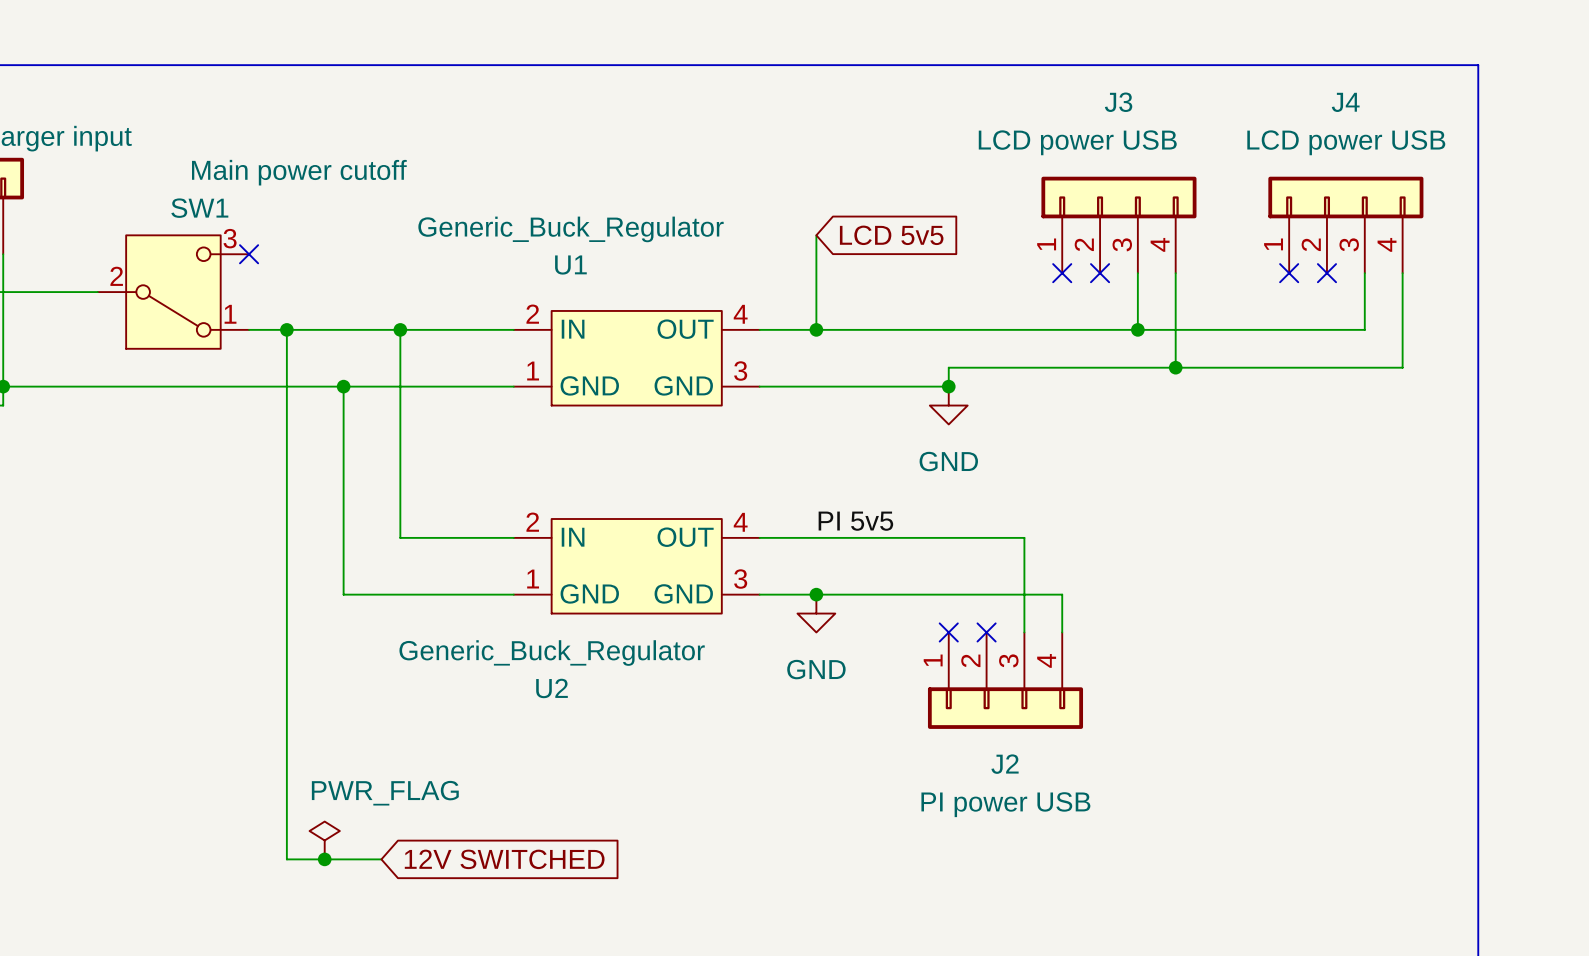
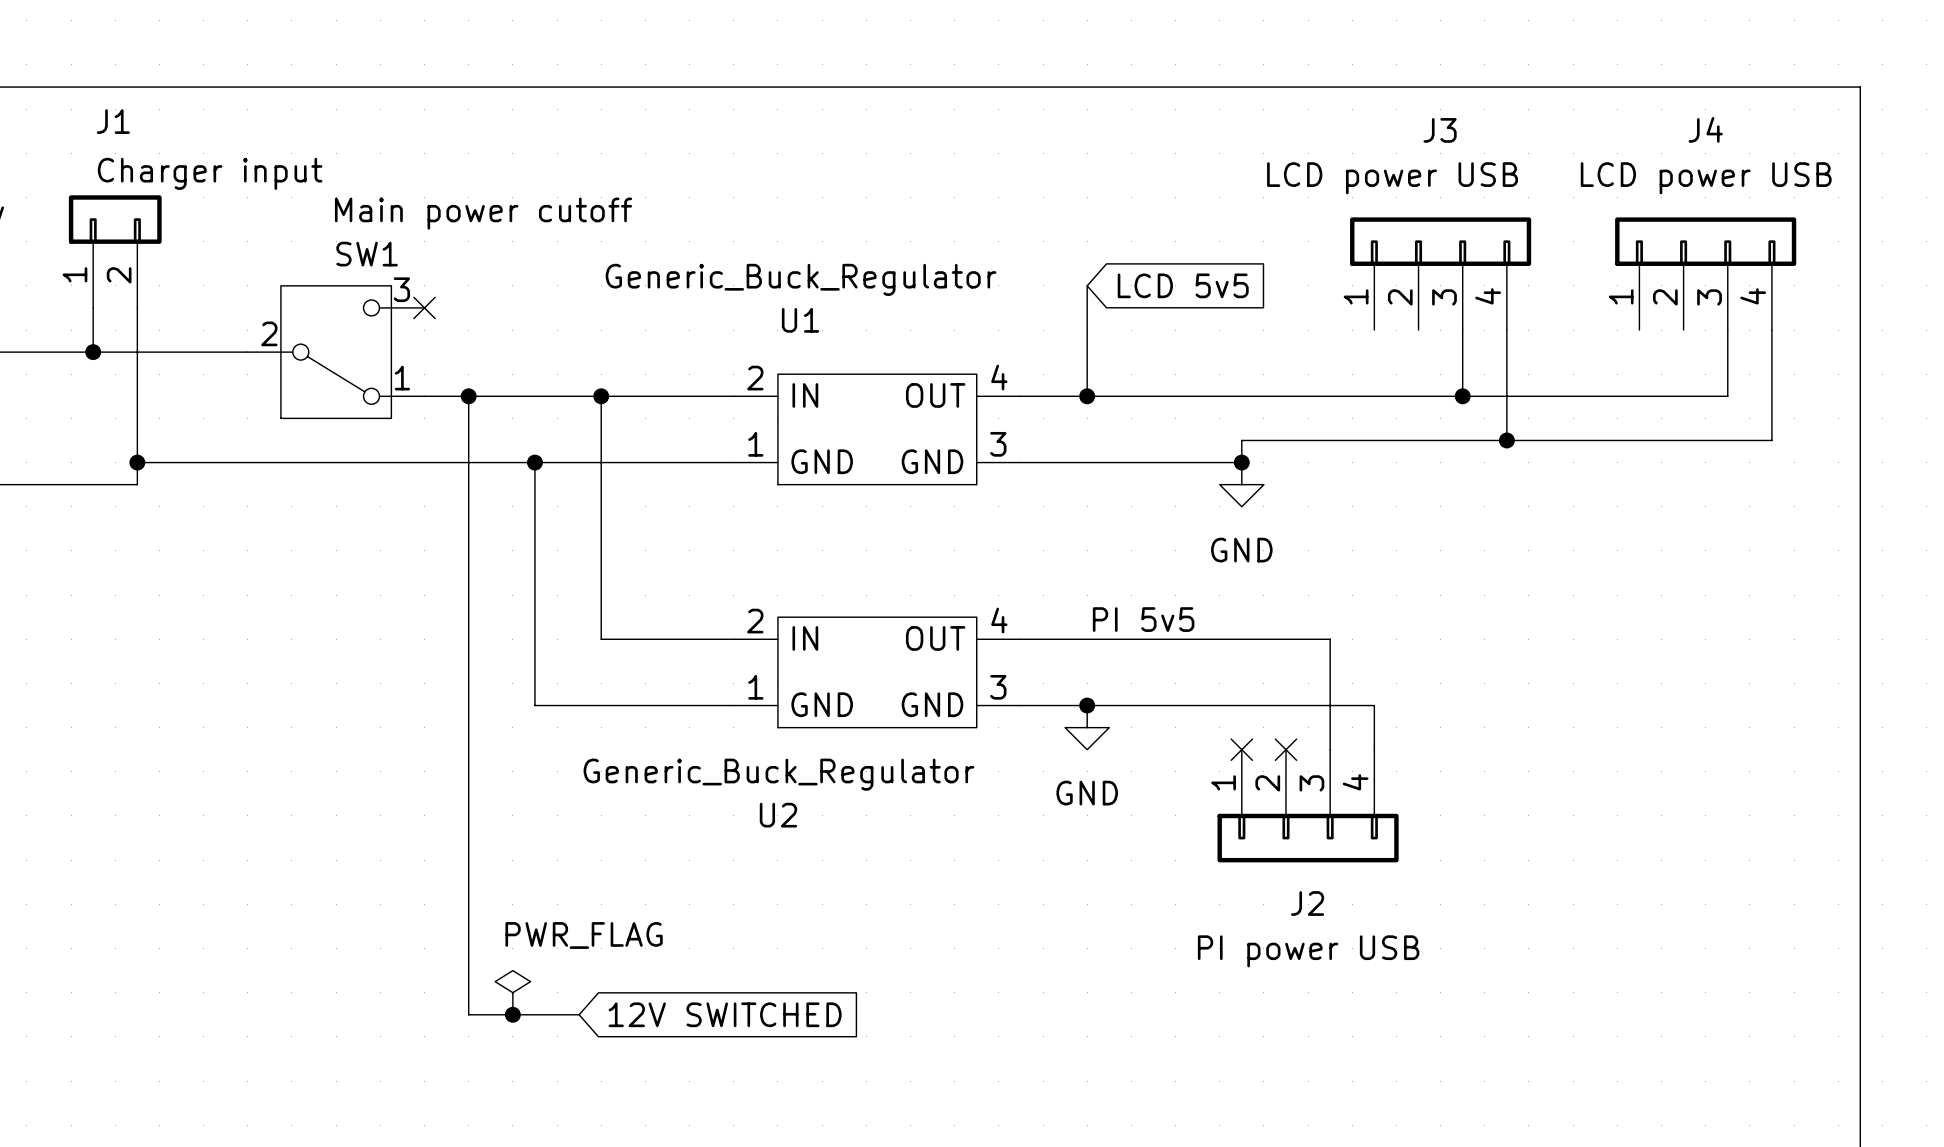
no-connect mark: (1062, 273) -> none
no-connect mark: (1100, 273) -> none
no-connect mark: (1289, 273) -> none
no-connect mark: (1326, 273) -> none

